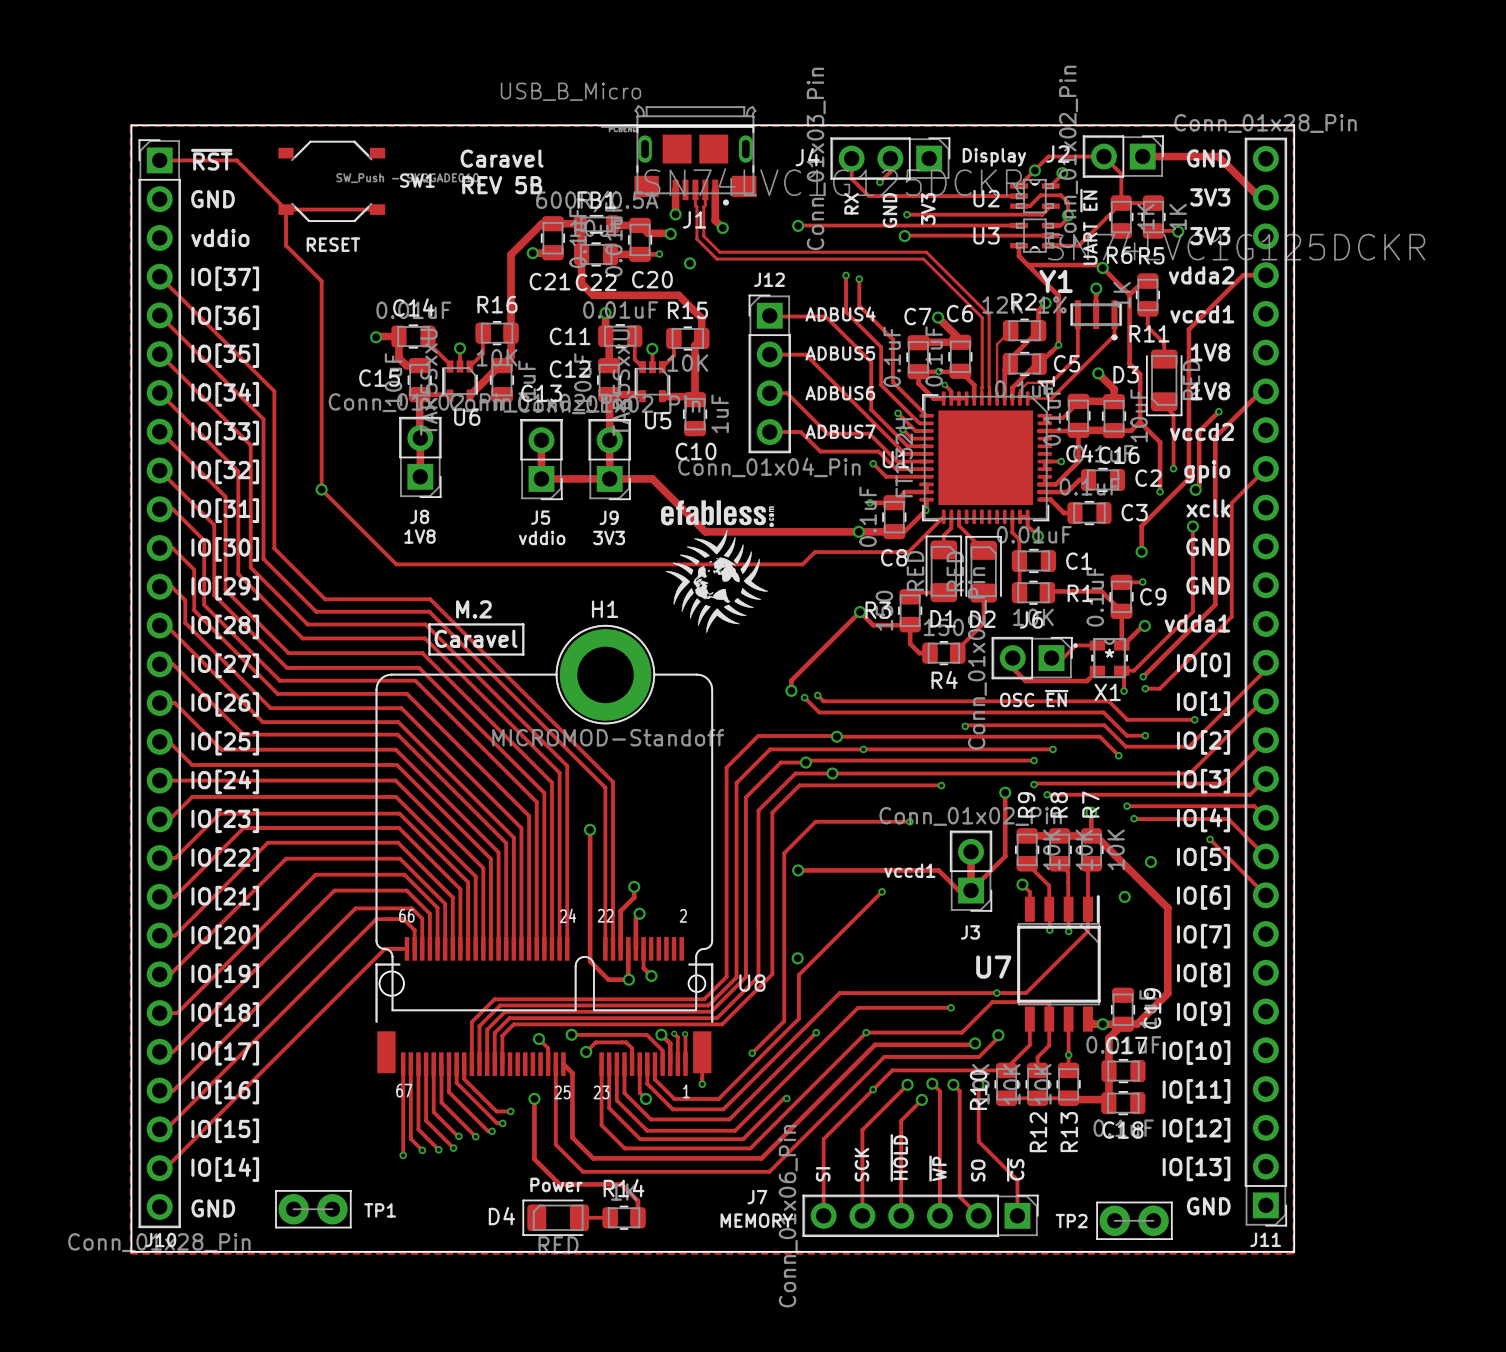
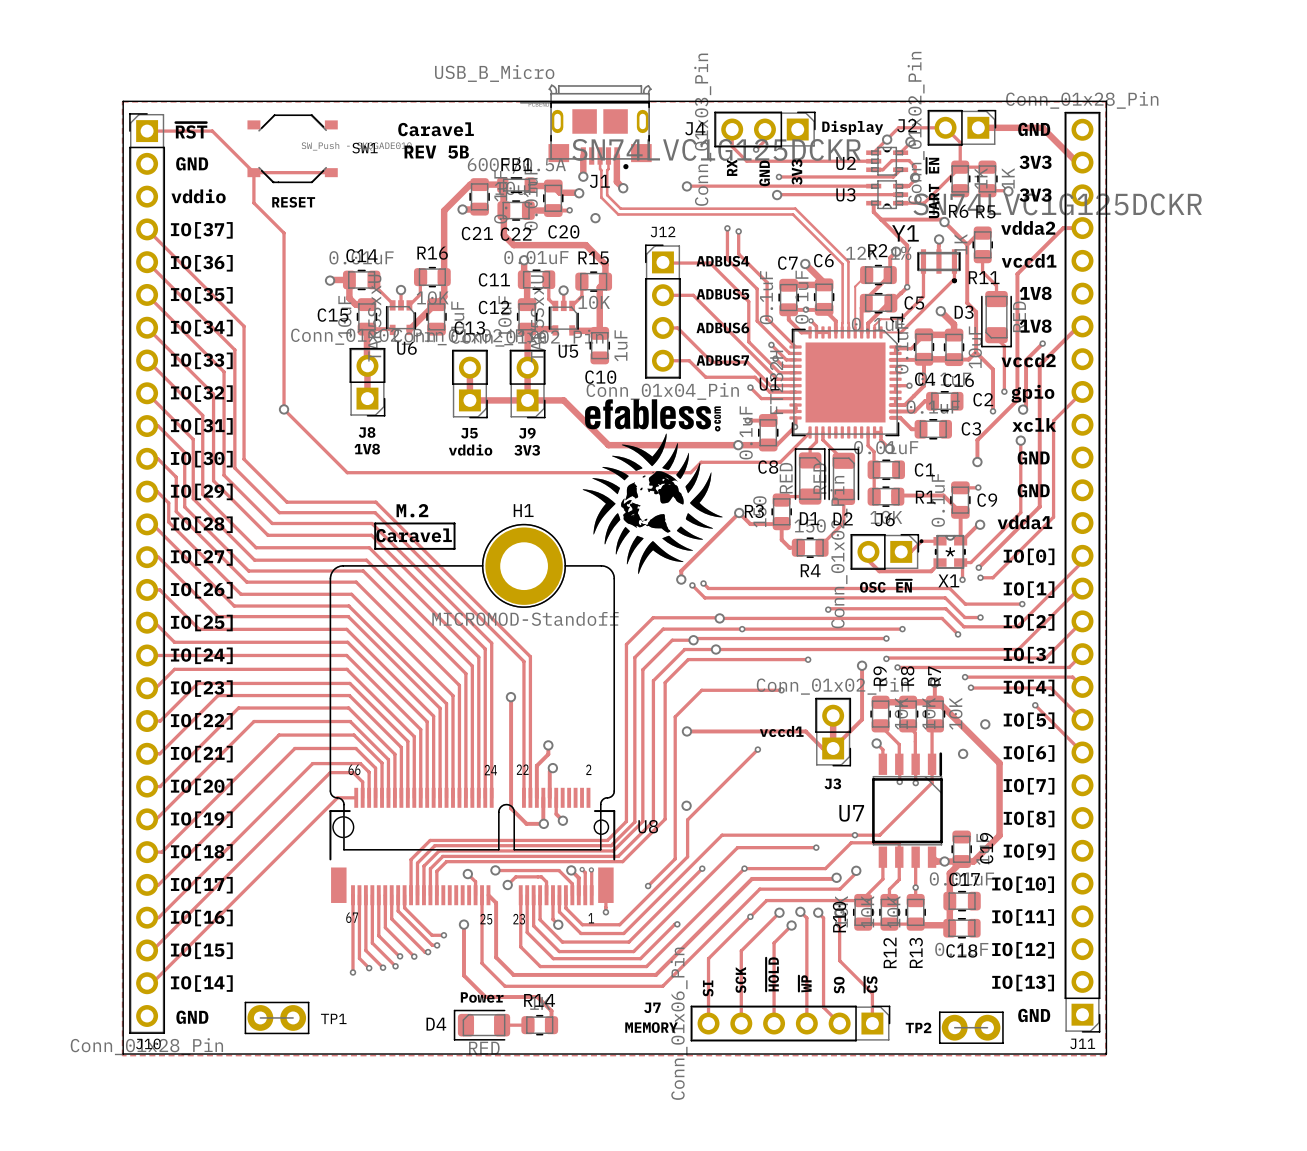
drawing: none -> [582, 399, 723, 575]
drawing: [661, 500, 775, 633] -> none

